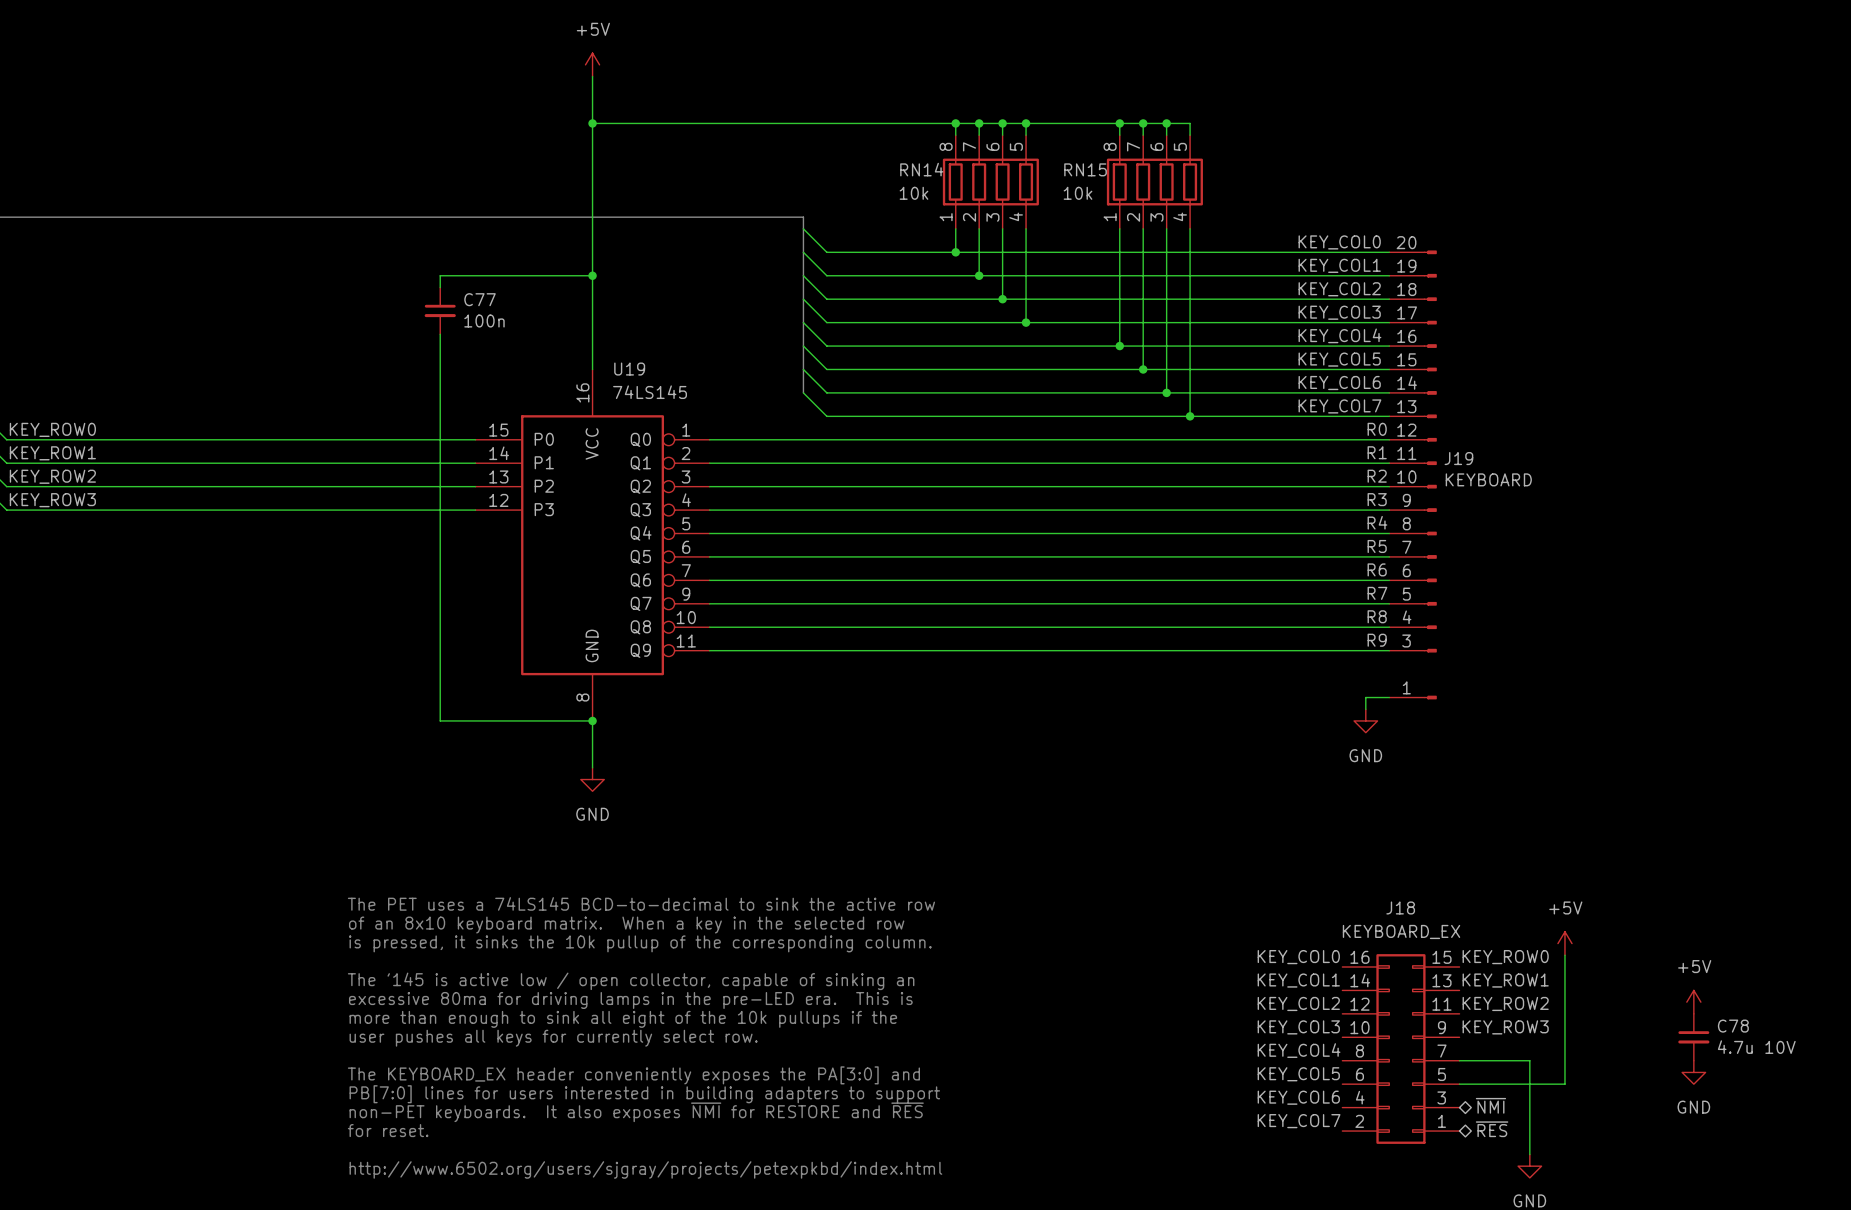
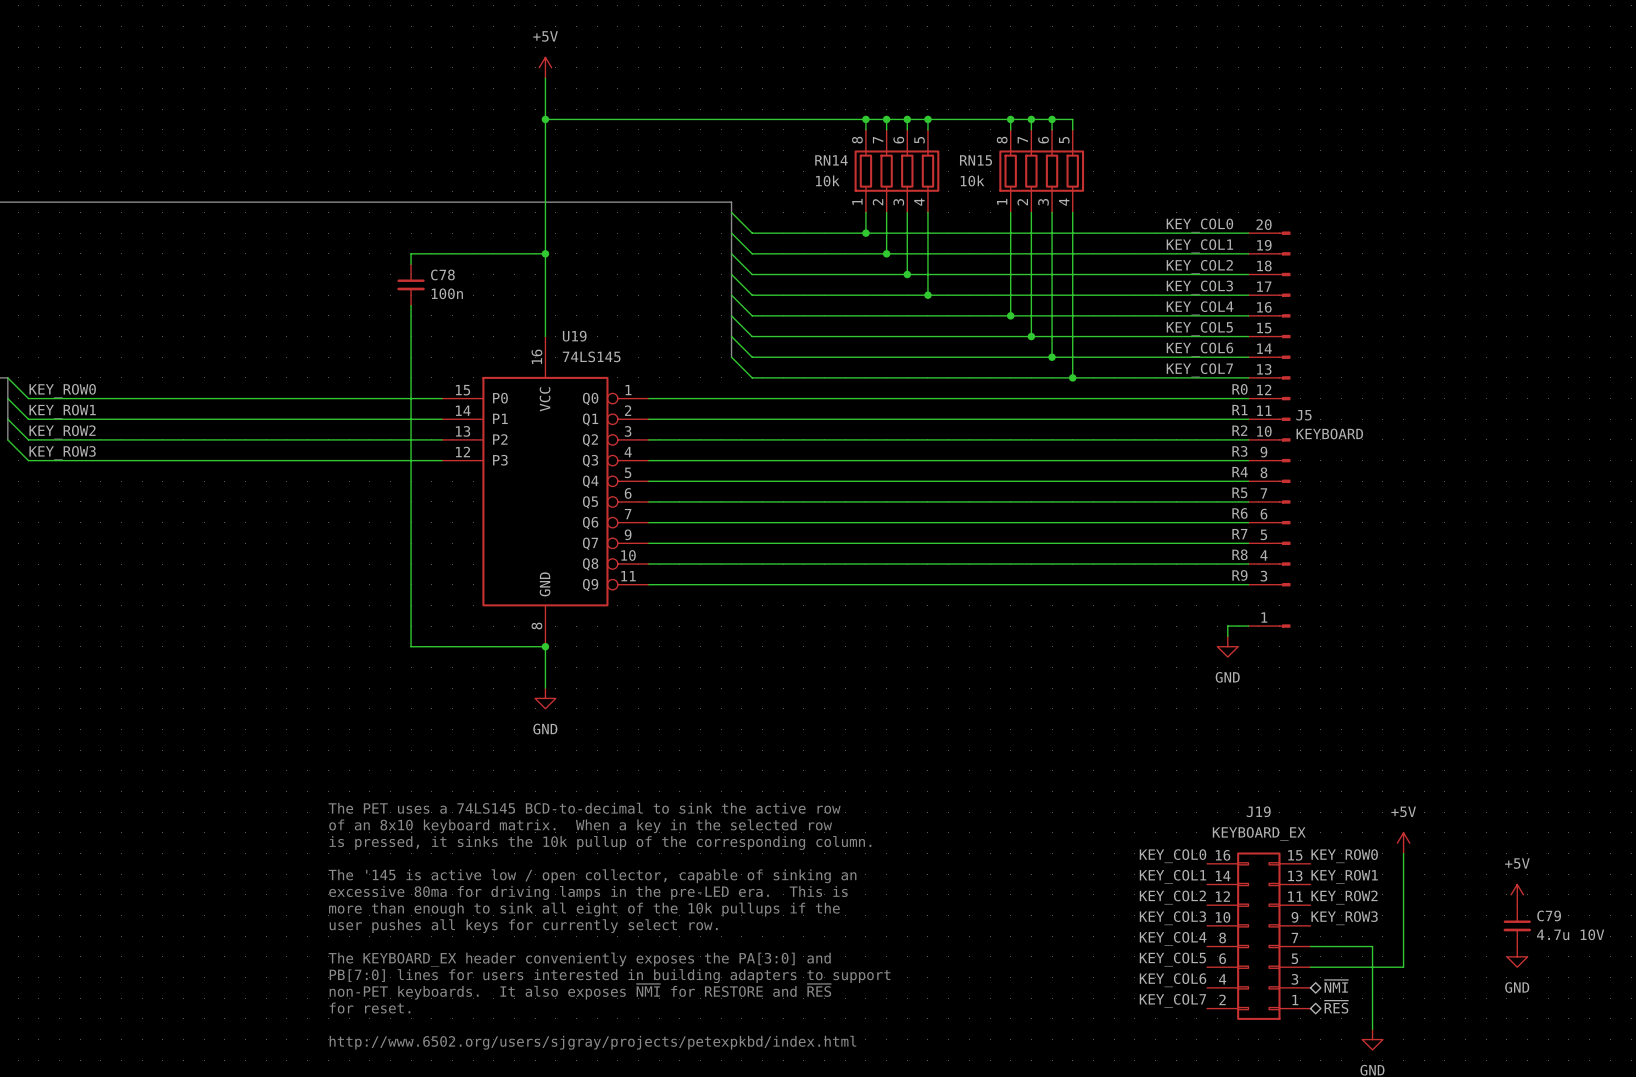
C77 name: C77 (480, 299) -> C78 (442, 274)
J19 name: J19 (1458, 458) -> J5 (1303, 415)
J18 name: J18 (1400, 907) -> J19 (1258, 811)
C78 name: C78 (1733, 1026) -> C79 (1549, 915)

